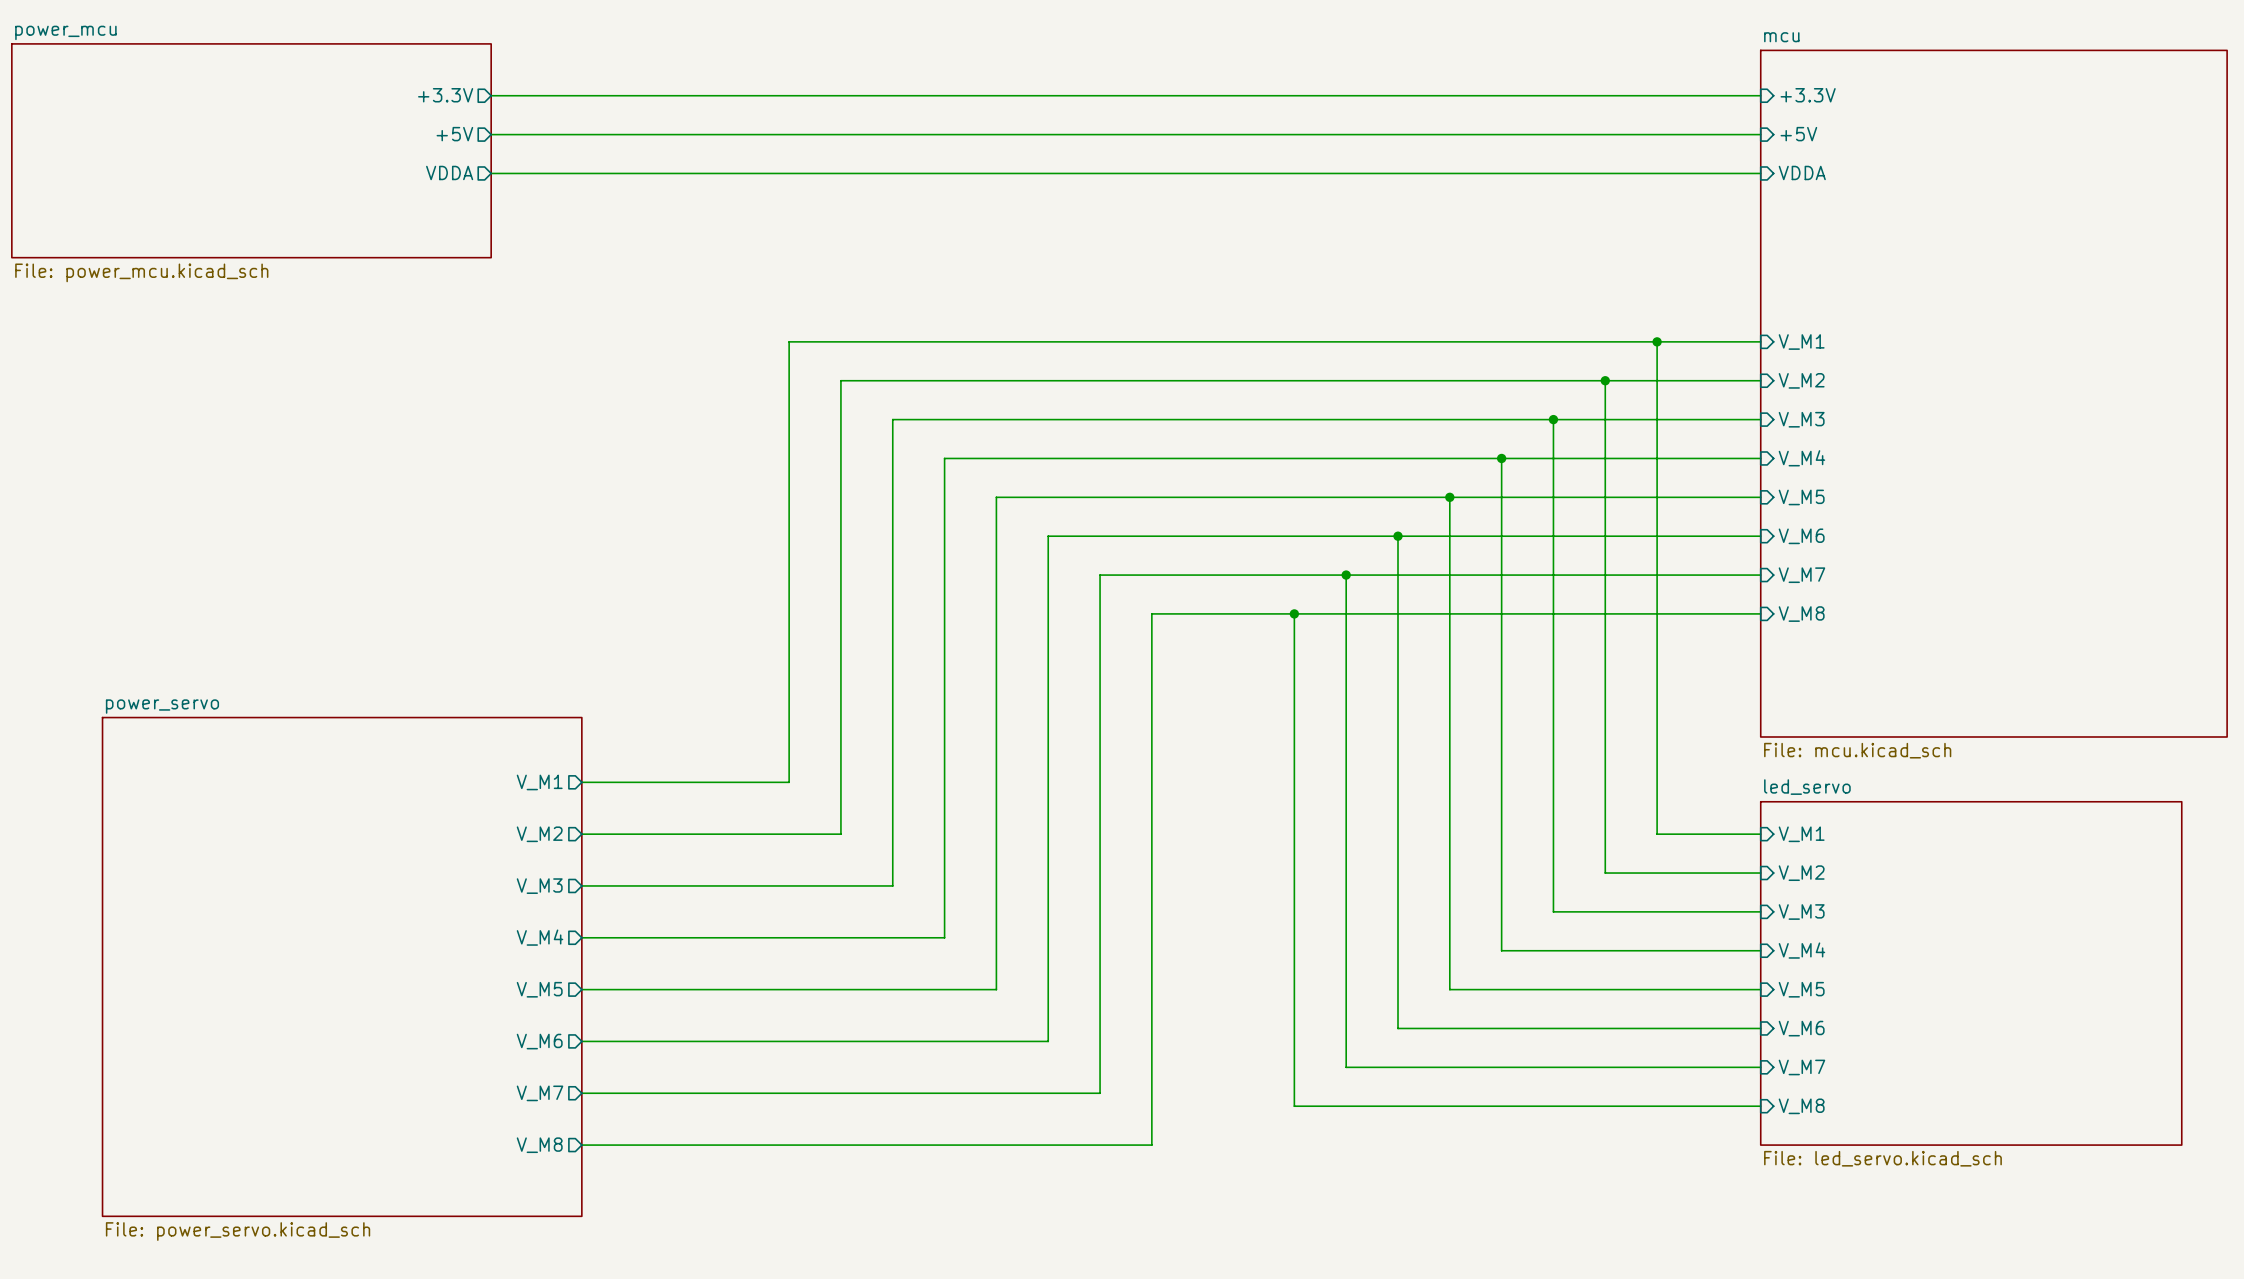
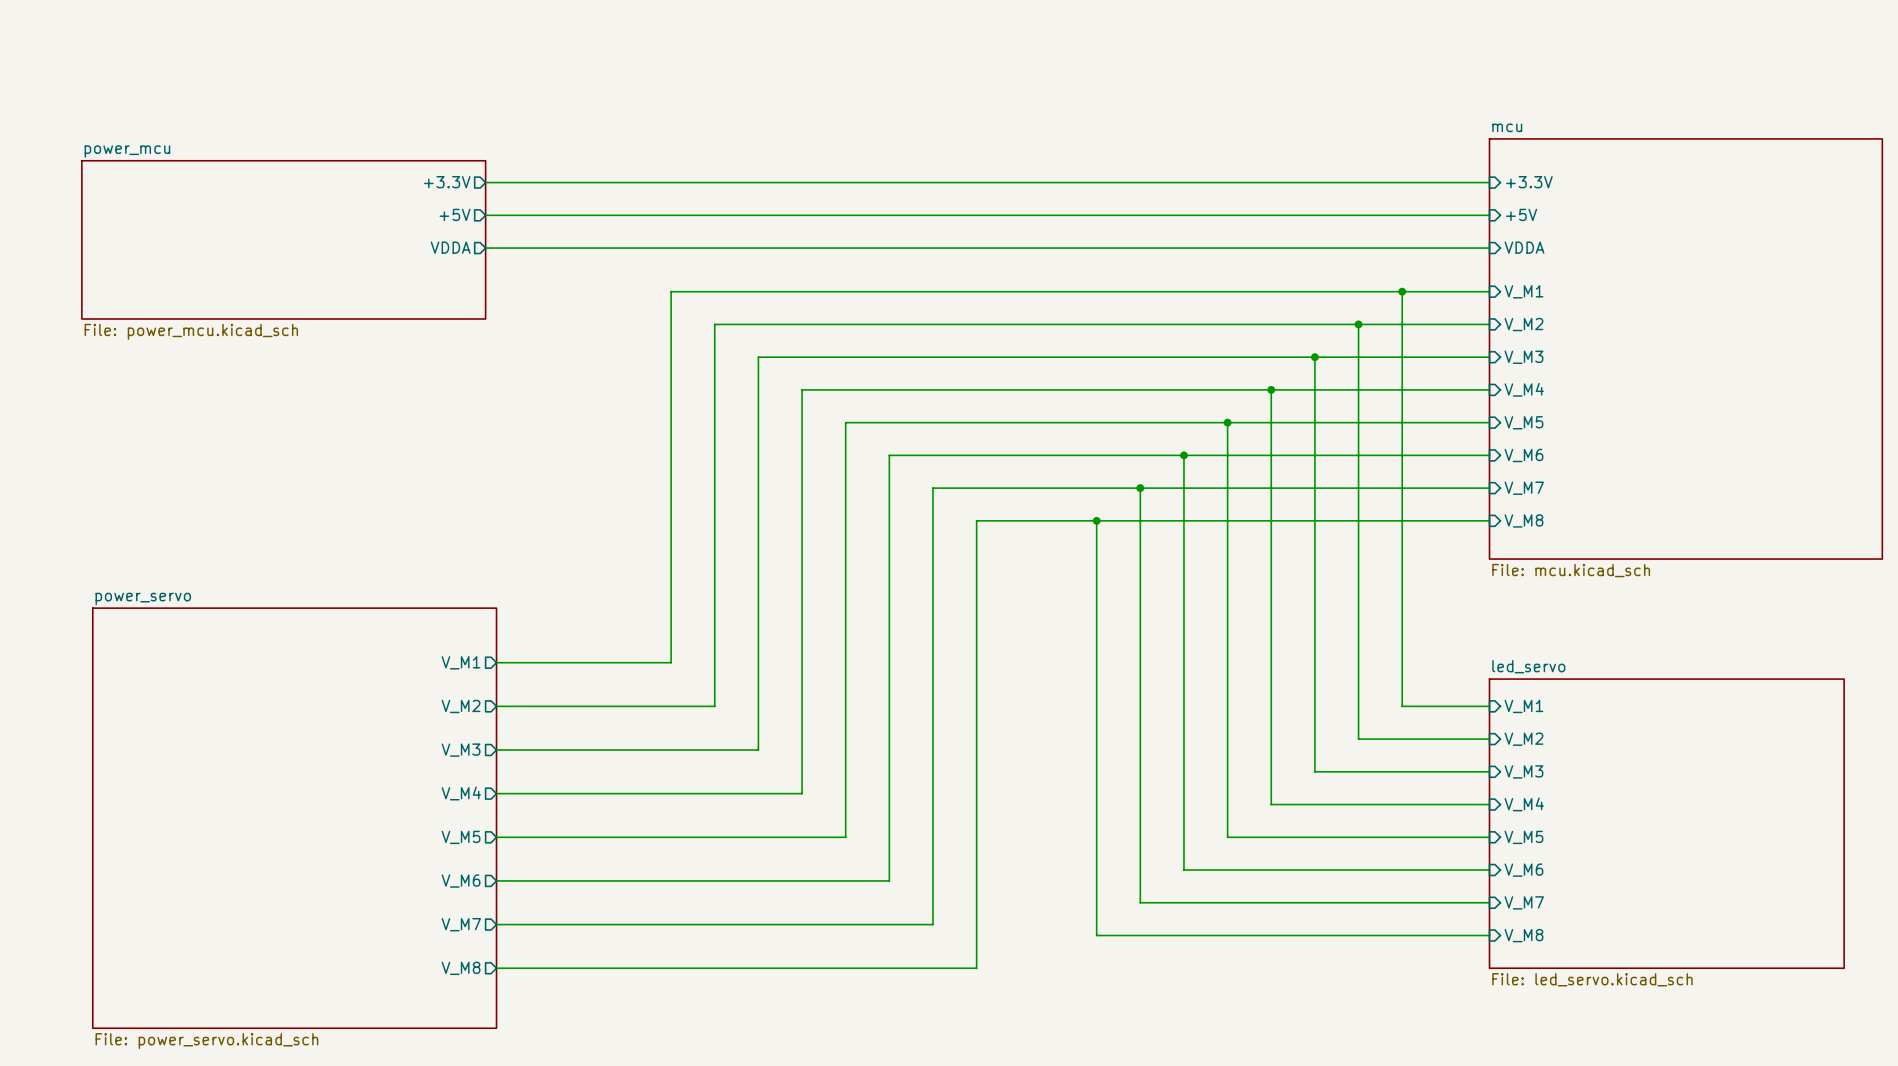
sheet pin position: +3.3V (445, 95) -> +3.3V (447, 182)
wire: (491, 95) (1760, 95) -> none
sheet pin position: +3.3V (1808, 95) -> +3.3V (1529, 182)
sheet pin position: +5V (454, 134) -> +5V (455, 214)
wire: (491, 134) (1760, 134) -> none
sheet pin position: +5V (1798, 134) -> +5V (1521, 214)
sheet power_mcu: File: power_mcu.kicad_sch (251, 150) -> none
sheet pin position: VDDA (449, 172) -> VDDA (450, 247)
sheet pin position: VDDA (1802, 172) -> VDDA (1524, 247)
wire: (491, 173) (1760, 173) -> none
wire: none -> (485, 182) (1489, 182)
wire: none -> (485, 215) (1489, 215)
sheet power_mcu: none -> File: power_mcu.kicad_sch (283, 239)
wire: none -> (485, 248) (1489, 248)
sheet mcu: File: mcu.kicad_sch (1993, 393) -> none
sheet mcu: none -> File: mcu.kicad_sch (1685, 348)

